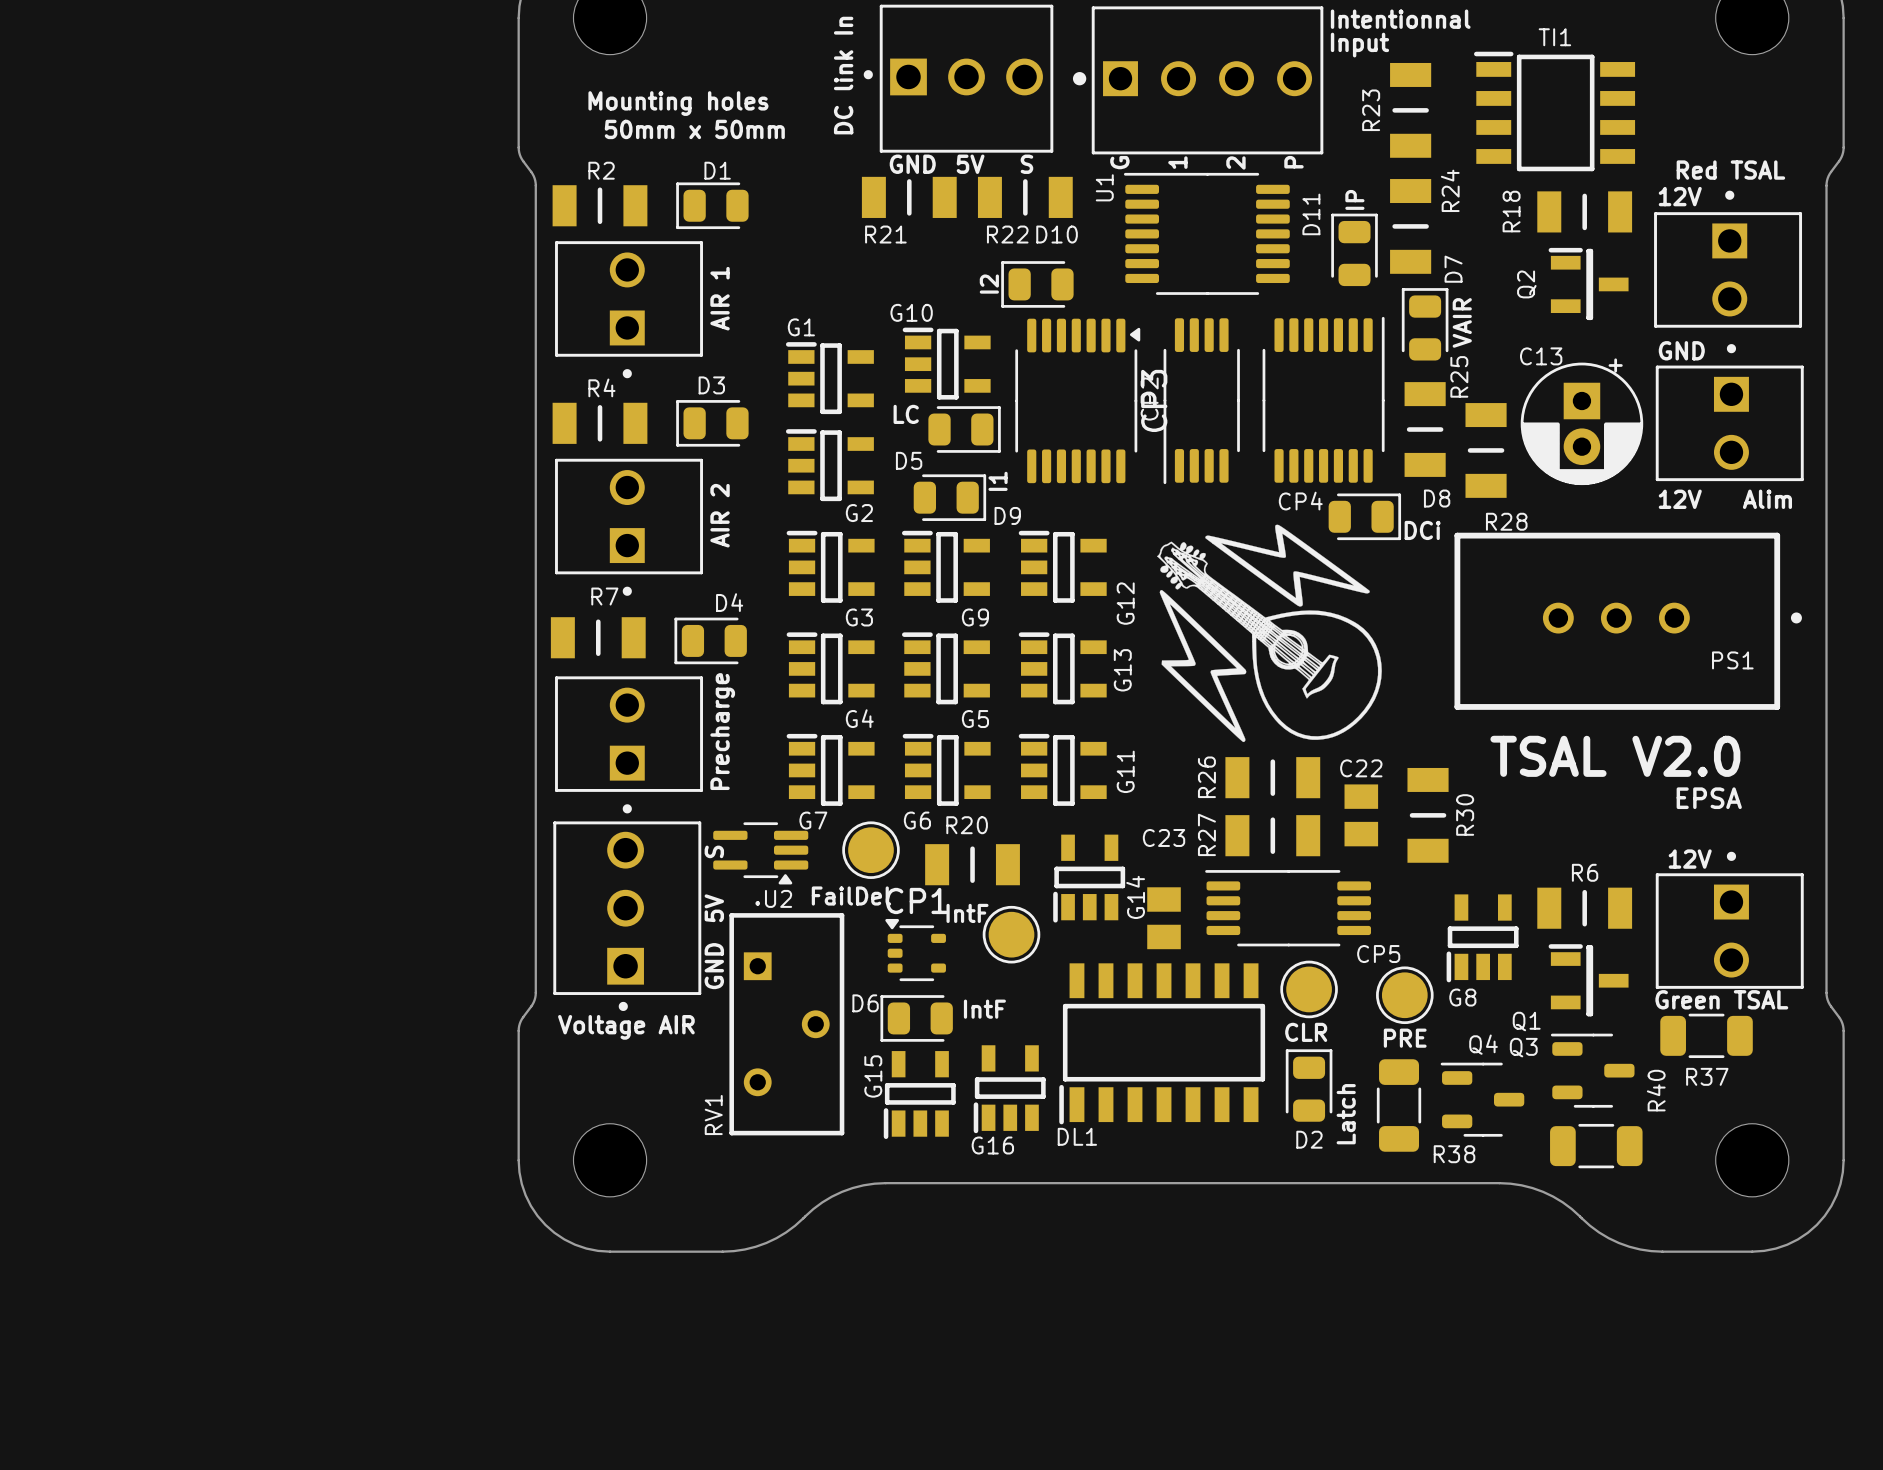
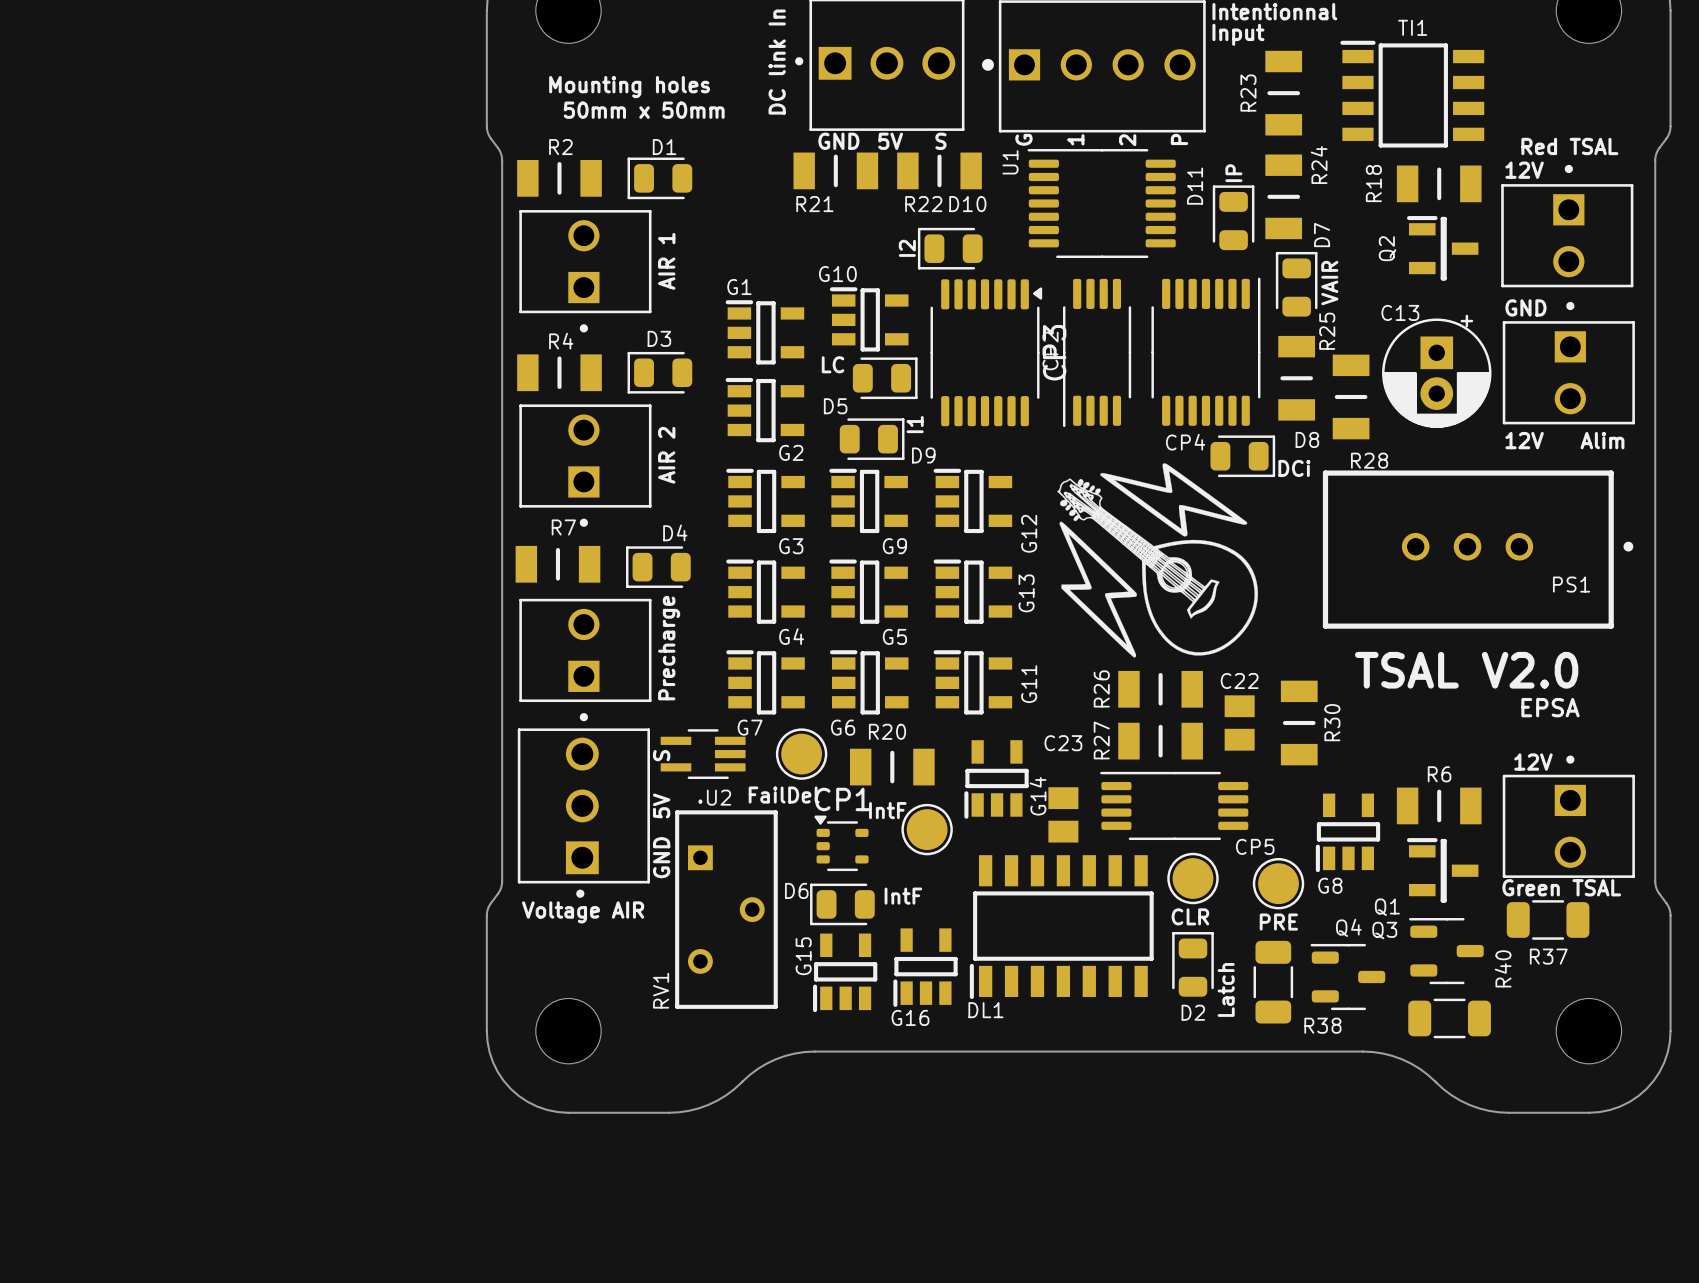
U2 footprint: [713, 822, 809, 885] -> [660, 729, 746, 779]

